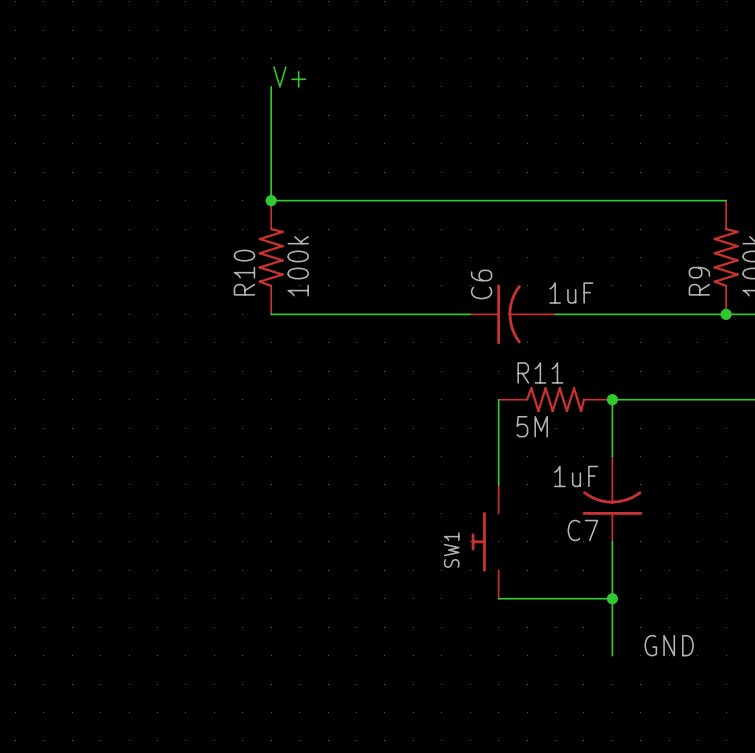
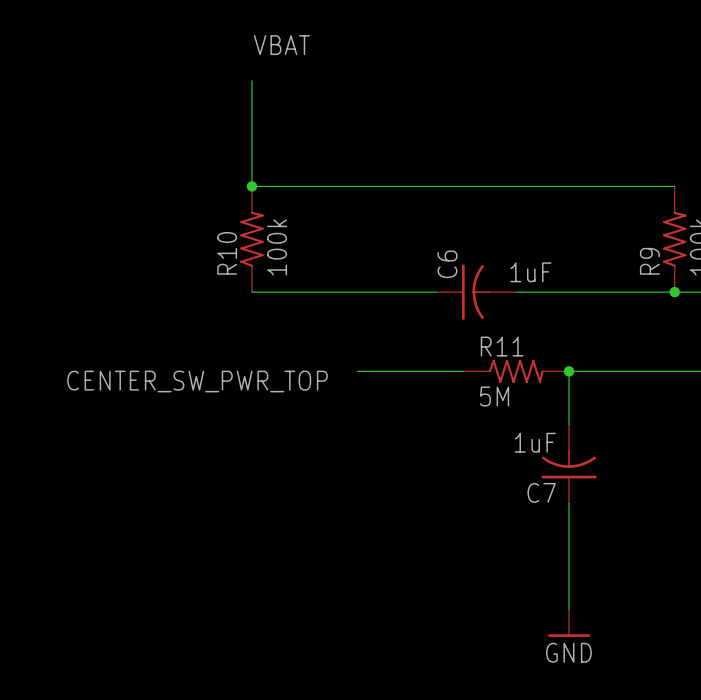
label: none -> VBAT (281, 45)
text: V+ (289, 76) -> none
wire: (498, 399) (498, 484) -> (463, 371) (357, 371)
label: none -> CENTER_SW_PWR_TOP (197, 381)
SW1: (485, 541) -> none
wire: (498, 598) (612, 598) -> none
junction: (612, 598) -> none
label: GND (669, 645) -> none
power symbol: none -> GND (569, 623)

